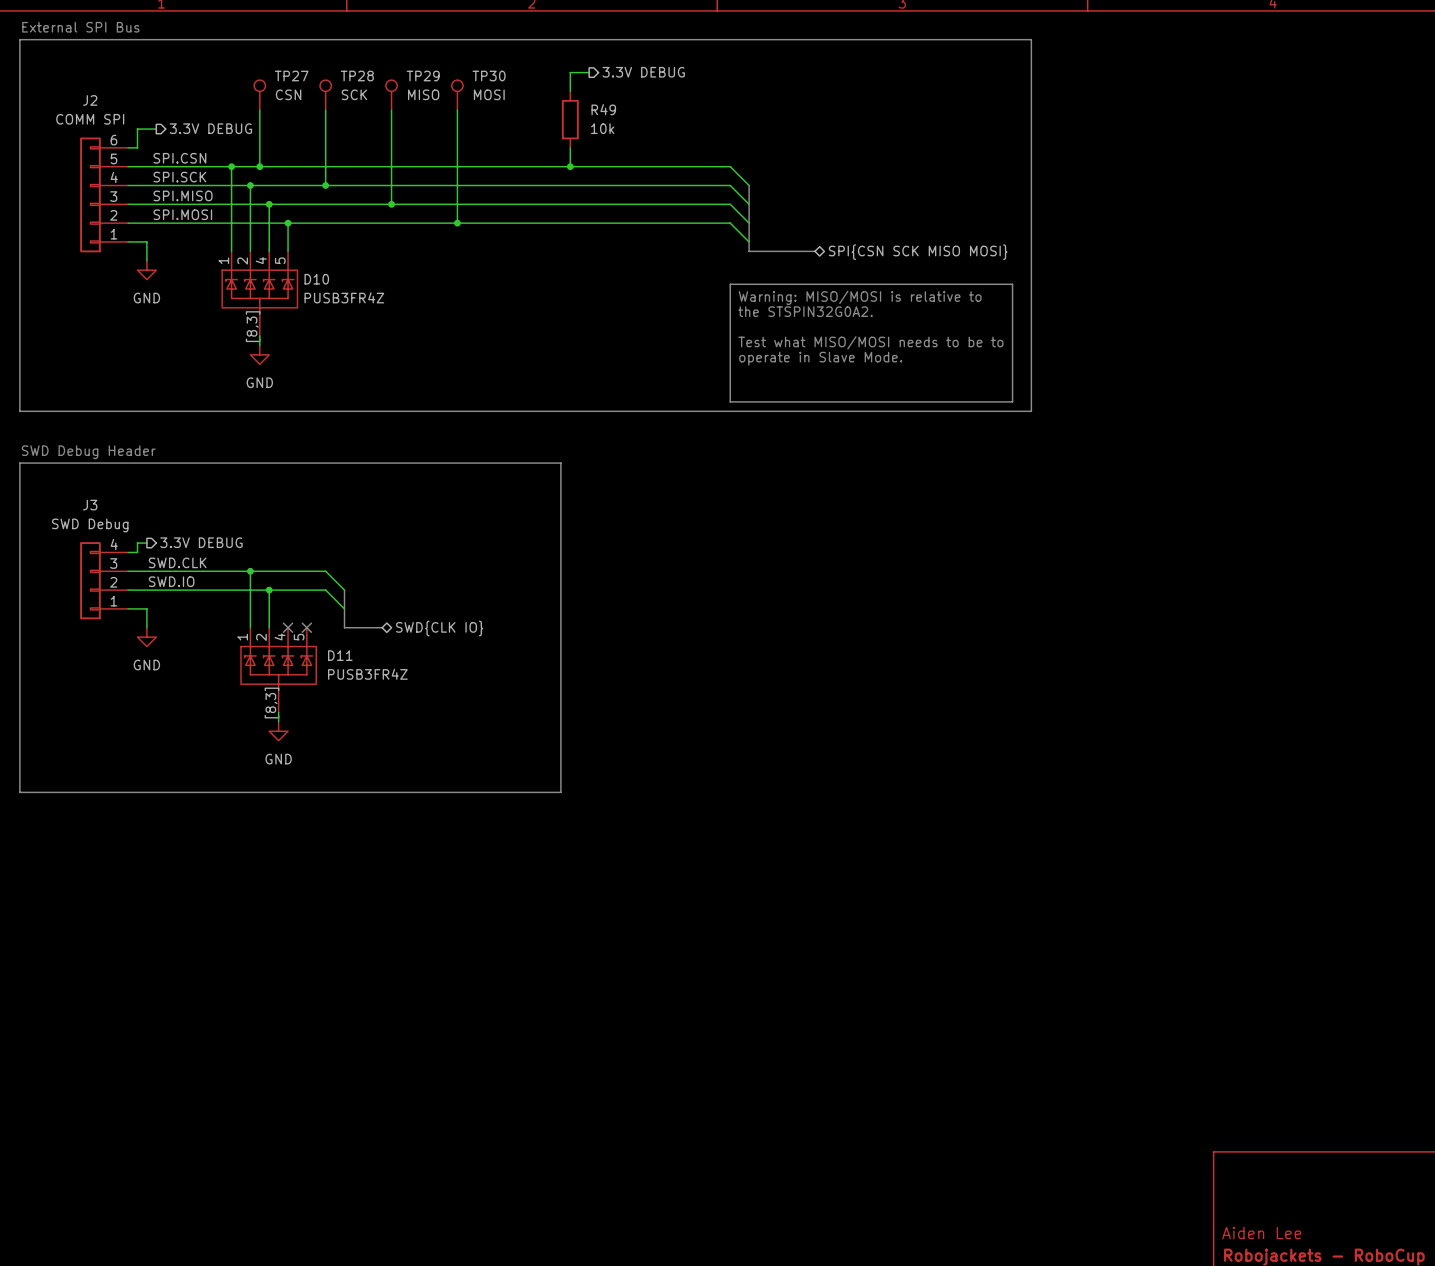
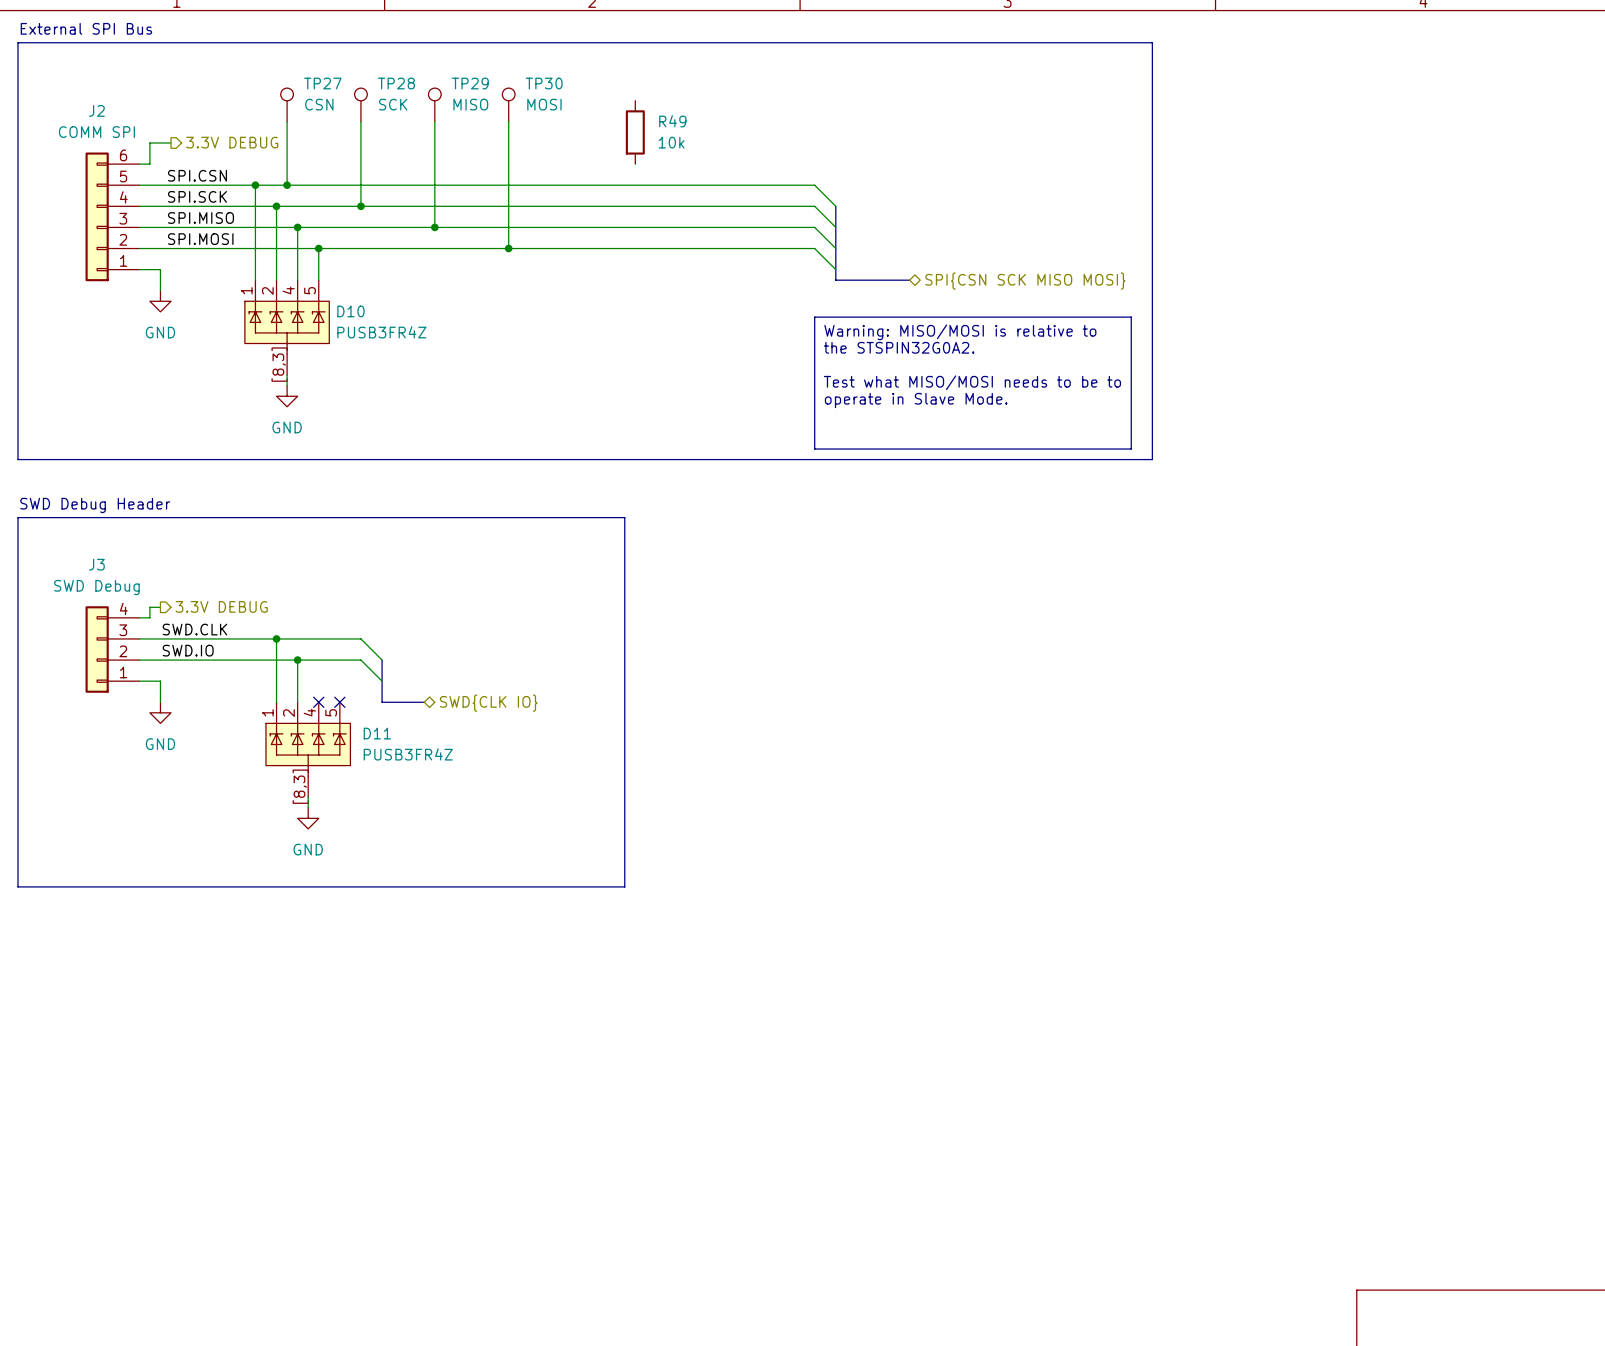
wire: (589, 72) (570, 72) (570, 91) -> none
hierarchical label: 3.3V DEBUG (643, 72) -> none
wire: (570, 147) (570, 166) -> none
junction: (570, 166) -> none

